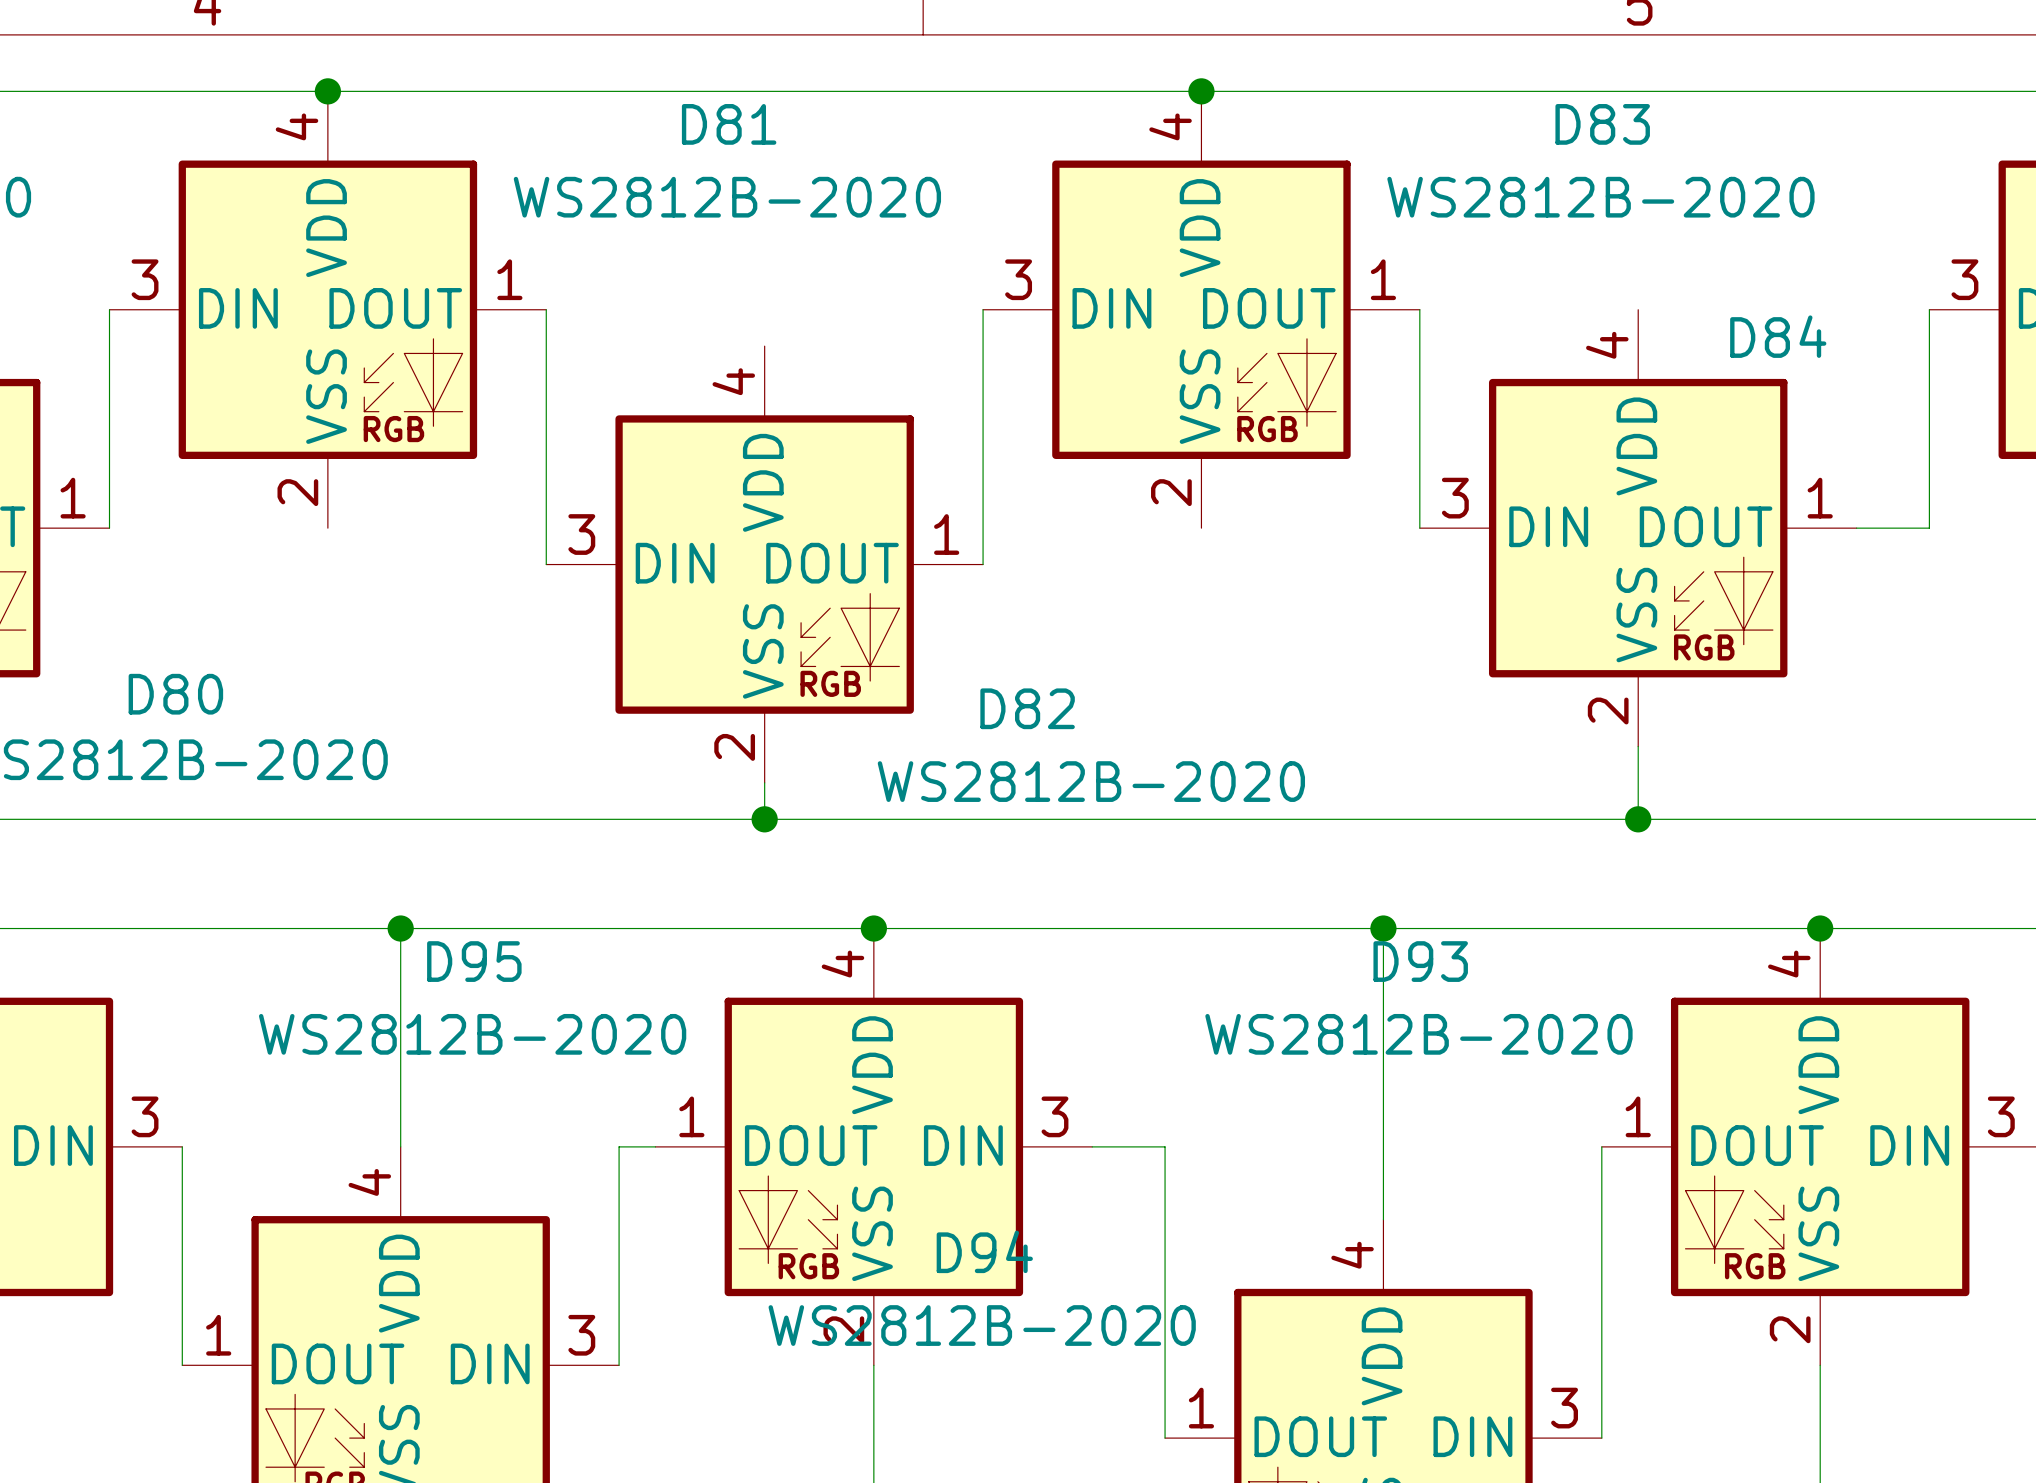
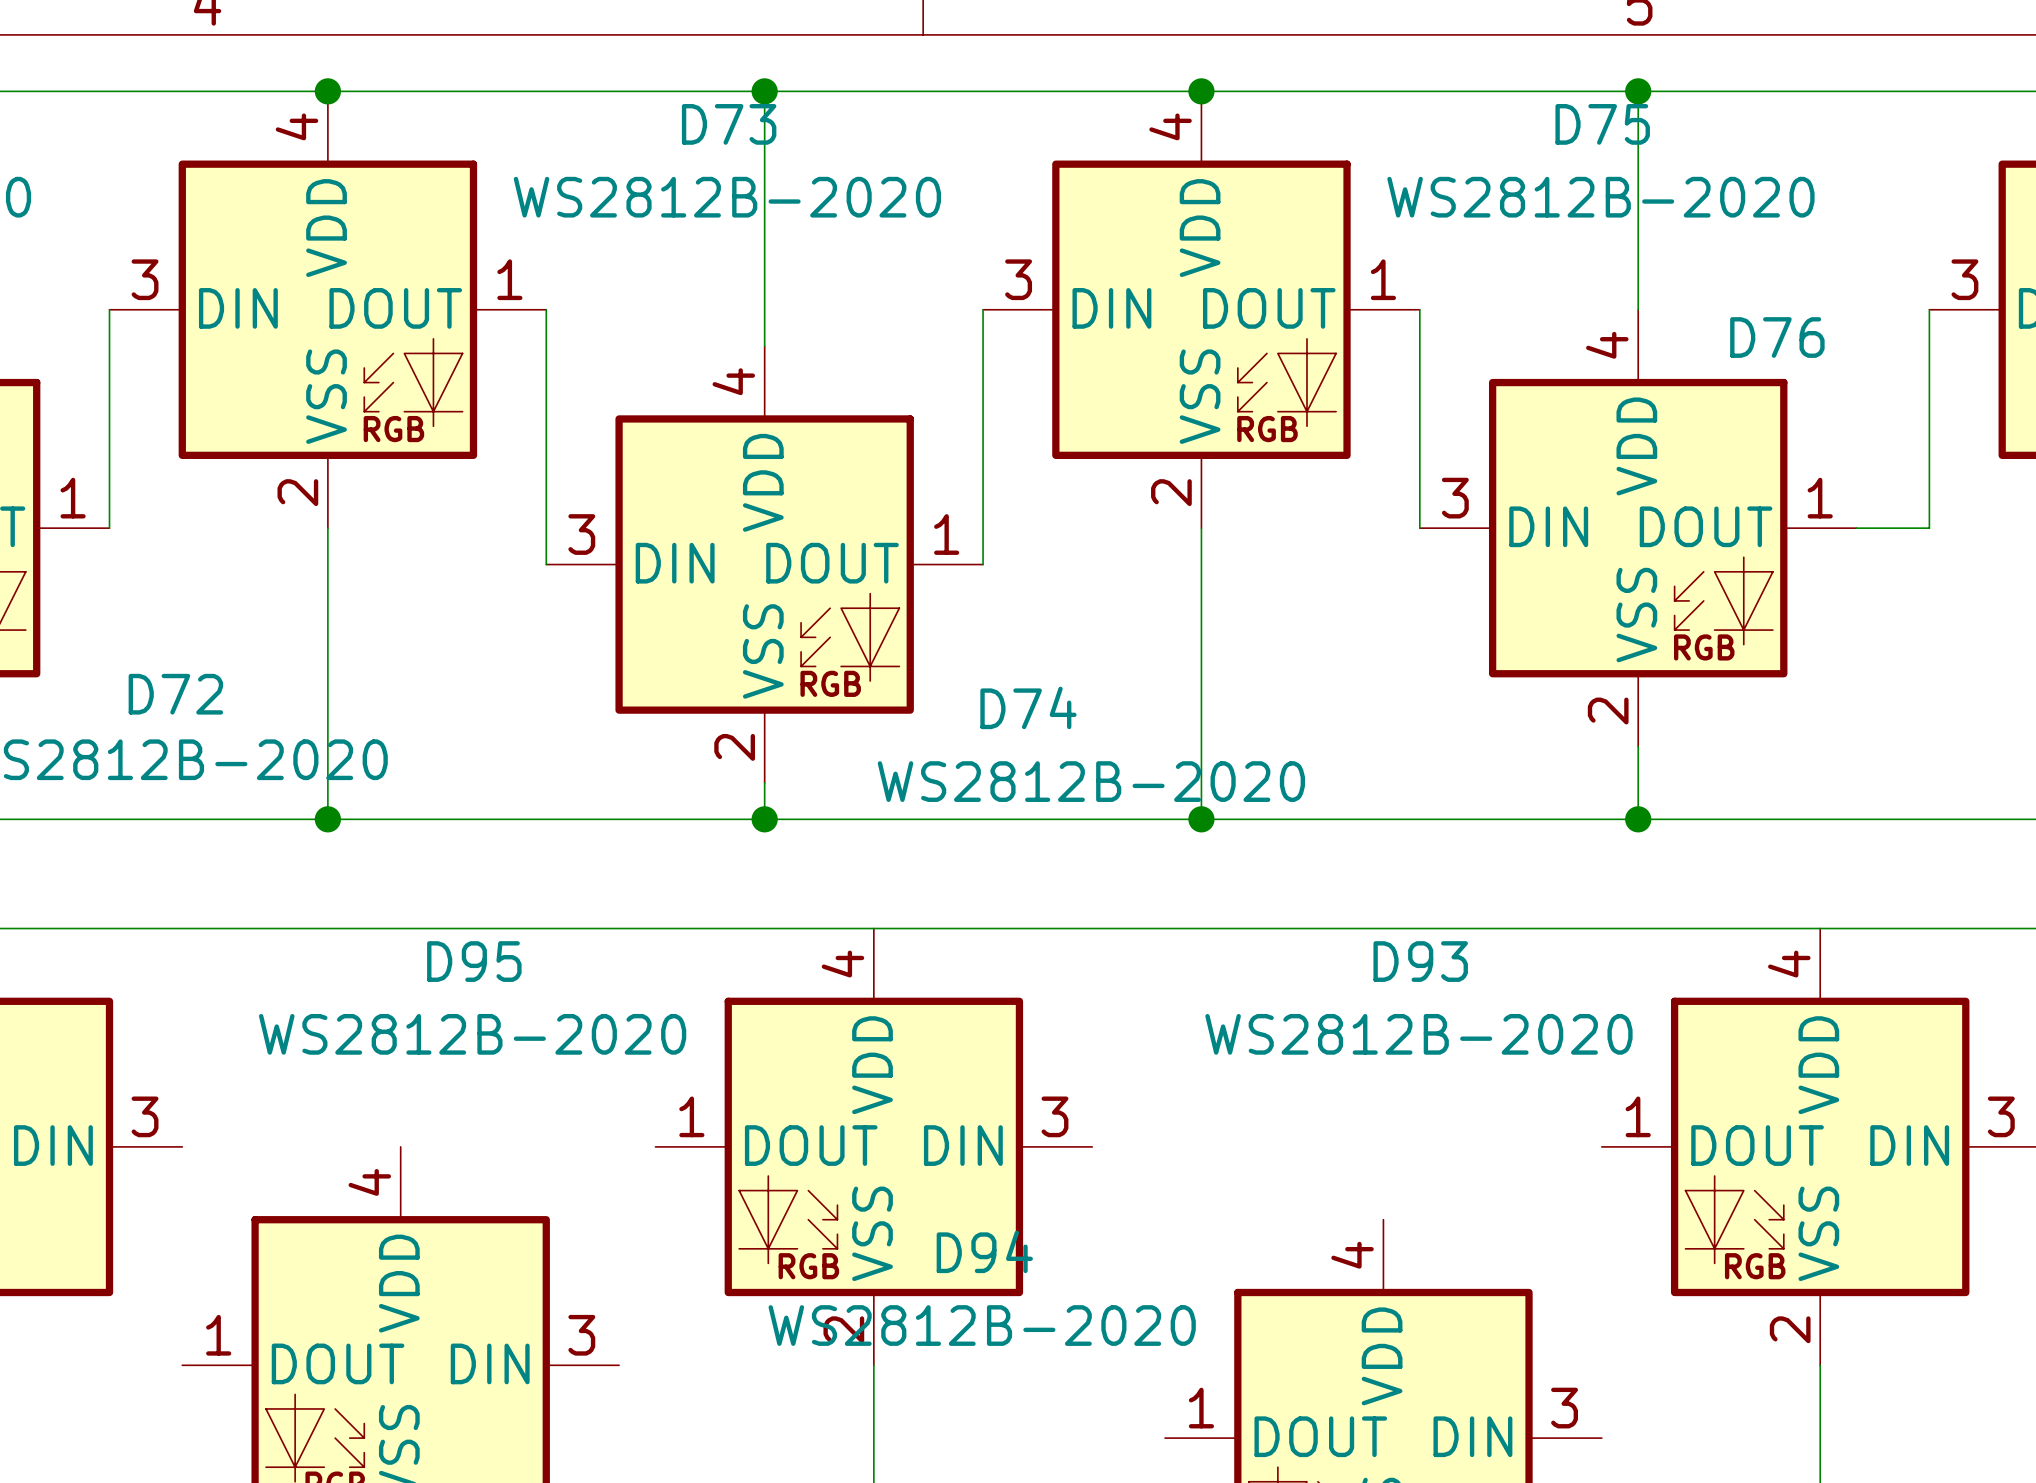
wire: none -> (764, 91) (764, 346)
junction: none -> (764, 91)
wire: none -> (1638, 91) (1638, 309)
junction: none -> (1638, 91)
D81 name: D81 (729, 124) -> D73 (729, 124)
D83 name: D83 (1602, 124) -> D75 (1602, 124)
D84 name: D84 (1778, 336) -> D76 (1777, 337)
wire: none -> (327, 528) (327, 819)
D80 name: D80 (175, 694) -> D72 (175, 694)
D82 name: D82 (1027, 708) -> D74 (1028, 707)
junction: none -> (1201, 819)
wire: (400, 928) (400, 1146) -> none
junction position: (400, 928) -> (327, 819)
junction: (873, 928) -> none
wire: (1383, 928) (1383, 1219) -> (1201, 528) (1201, 819)
junction: (1383, 928) -> none
junction: (1820, 928) -> none
wire: (182, 1146) (182, 1365) -> none
wire: (655, 1146) (619, 1146) (619, 1365) -> none
wire: (1092, 1146) (1165, 1146) (1165, 1438) -> none
wire: (1601, 1146) (1601, 1438) -> none

